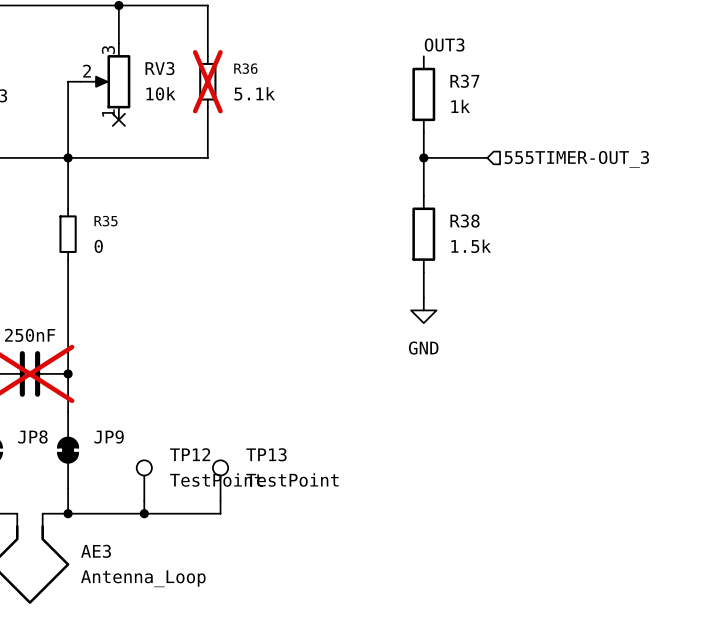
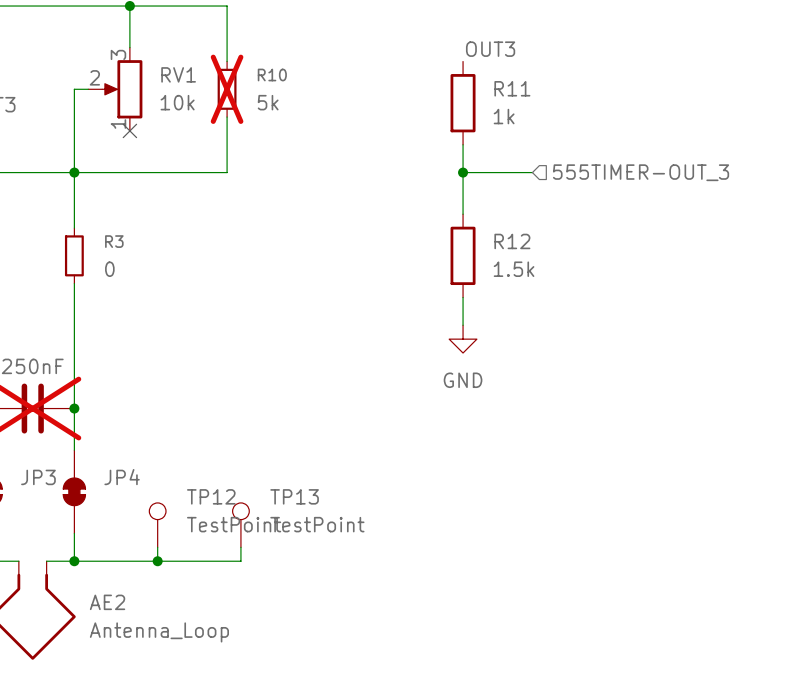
RV3 name: RV3 (160, 68) -> RV1 (178, 74)
R36 name: R36 (245, 68) -> R10 (272, 75)
R37 name: R37 (464, 81) -> R11 (512, 88)
R36 value: 5.1k (254, 93) -> 5k (268, 102)
R35 name: R35 (106, 221) -> R3 (114, 241)
R38 name: R38 (465, 221) -> R12 (512, 241)
JP8 name: JP8 (32, 436) -> JP3 (38, 477)
JP9 name: JP9 (109, 436) -> JP4 (122, 477)
AE3 name: AE3 (96, 551) -> AE2 (107, 602)

